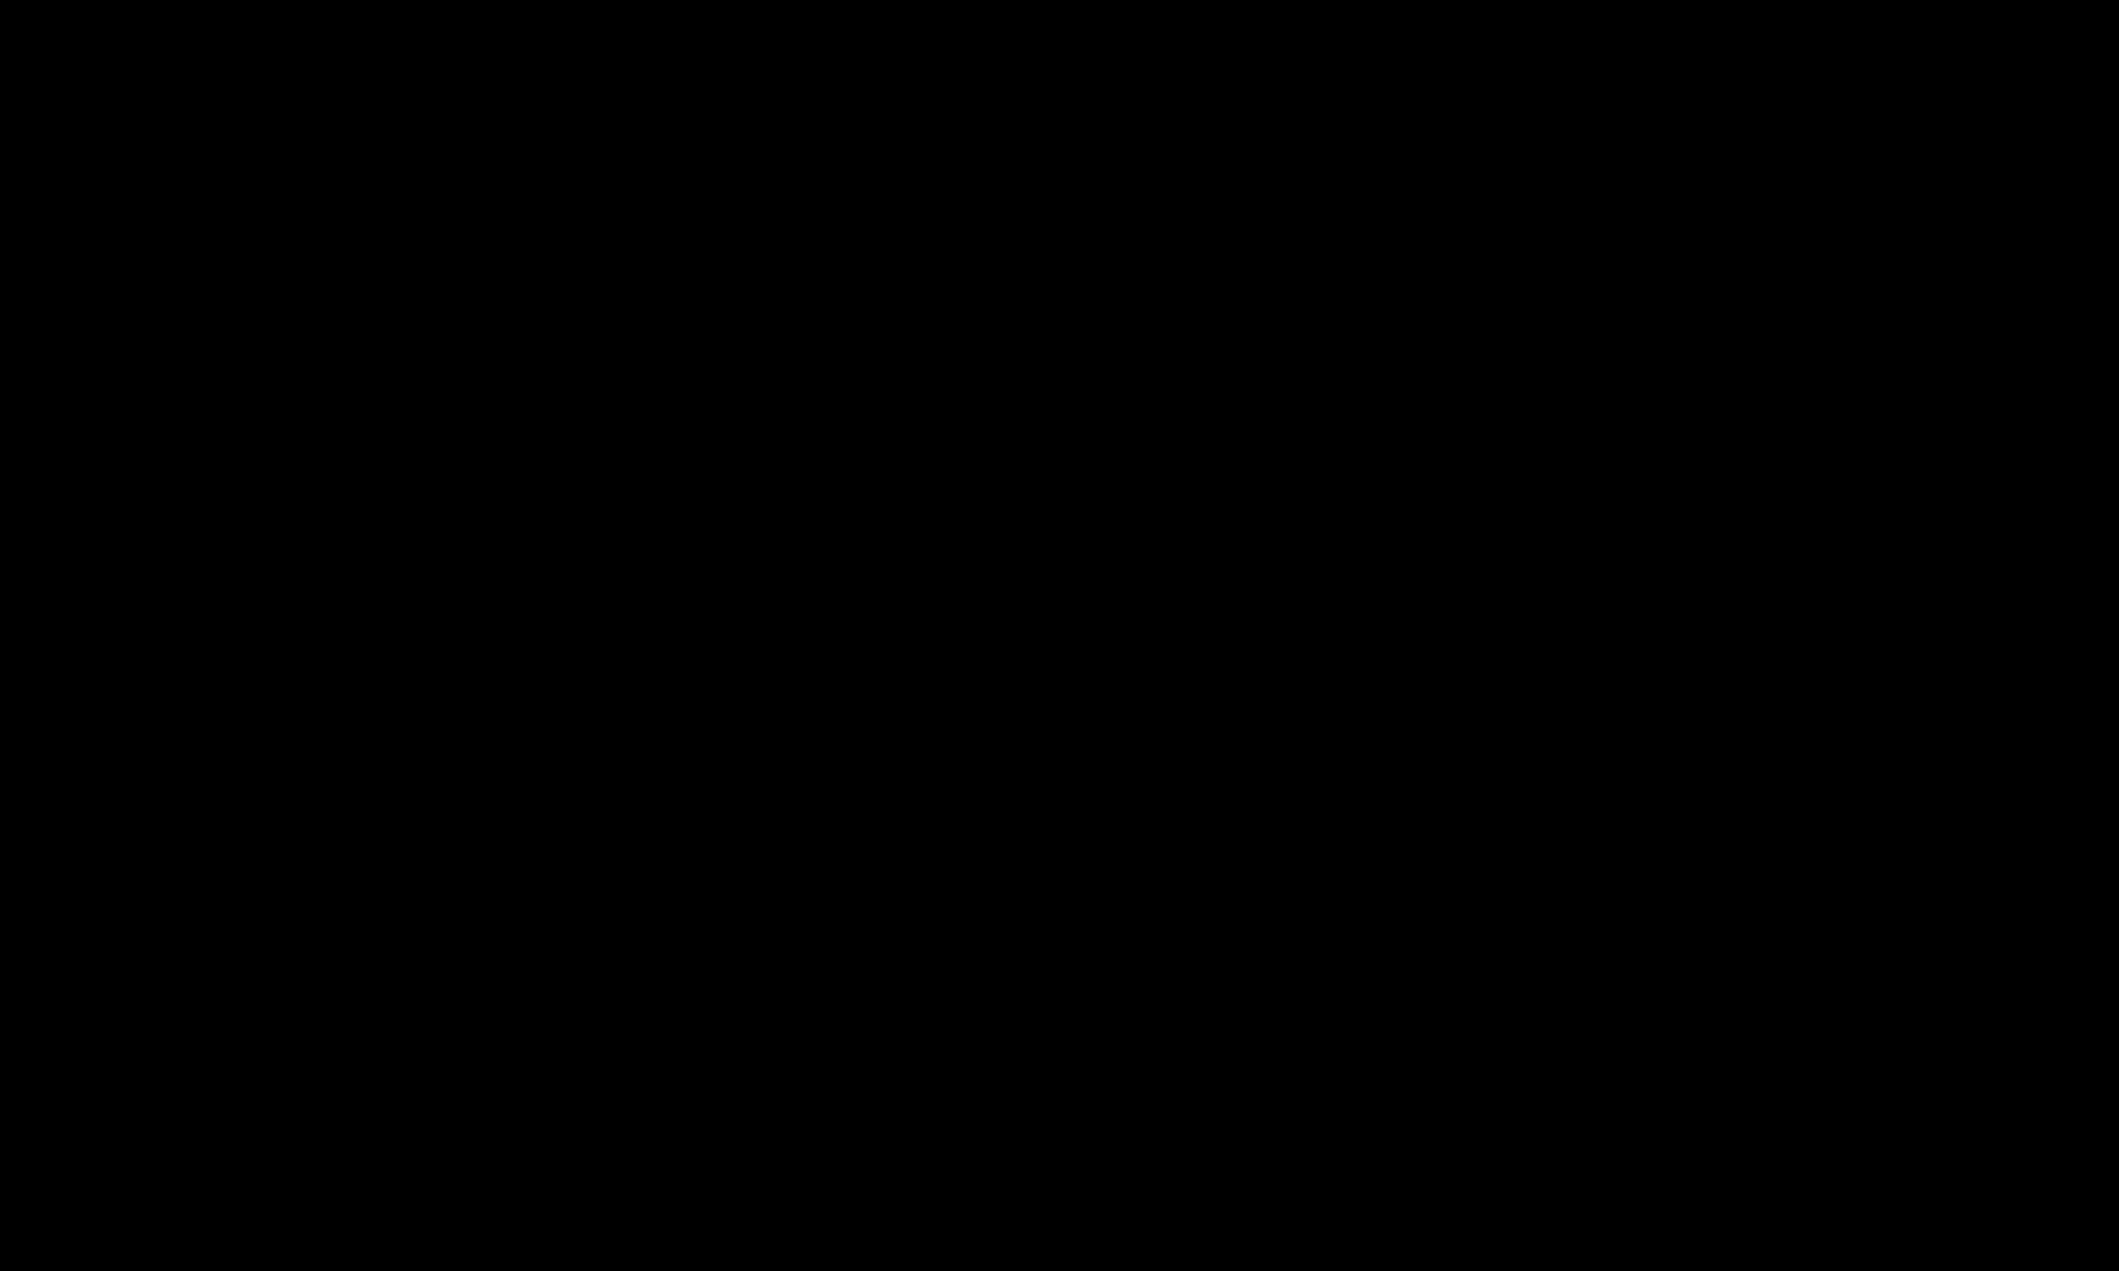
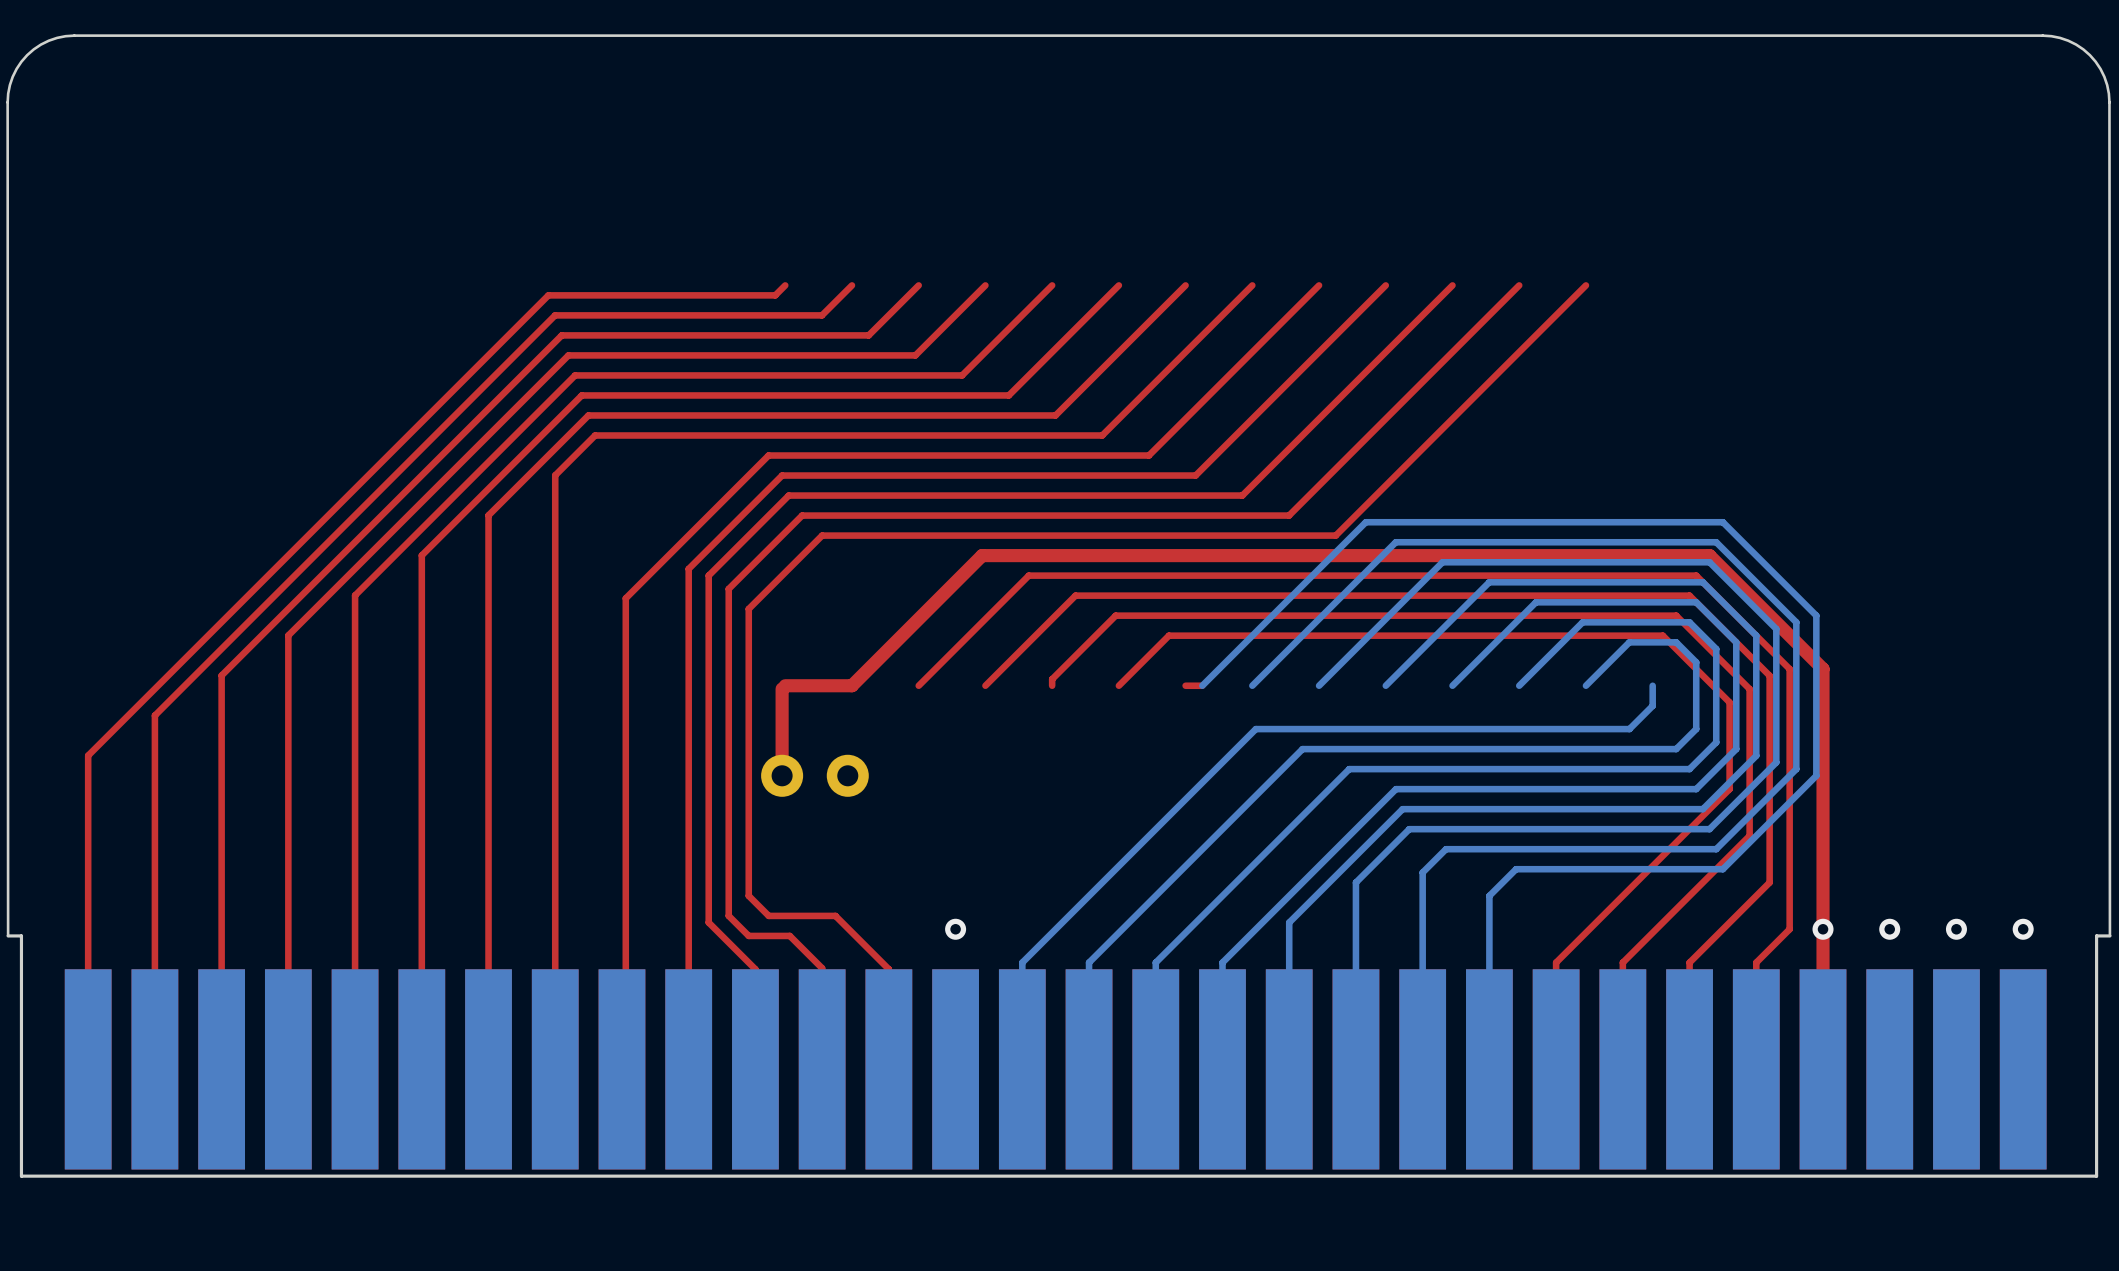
top track: none -> (785, 285) (775, 295) (548, 295) (88, 755) (88, 1069)
top track: none -> (851, 285) (821, 315) (555, 315) (154, 715) (154, 1069)
top track: none -> (918, 285) (868, 335) (561, 335) (221, 675) (221, 1069)
top track: none -> (985, 285) (915, 355) (568, 355) (288, 635) (288, 1069)
top track: none -> (1052, 285) (962, 375) (575, 375) (355, 595) (355, 1069)
top track: none -> (1118, 285) (1008, 395) (581, 395) (421, 555) (421, 1069)
top track: none -> (1185, 285) (1055, 415) (588, 415) (488, 515) (488, 1069)
top track: none -> (1252, 285) (1102, 435) (595, 435) (555, 475) (555, 1069)
top track: none -> (1319, 285) (1148, 455) (768, 455) (625, 598) (625, 1065) (621, 1069)
top track: none -> (1385, 285) (1195, 475) (782, 475) (688, 568) (688, 1069)
top track: none -> (1452, 285) (1242, 495) (788, 495) (708, 575) (708, 922) (755, 969) (755, 1069)
top track: none -> (1519, 285) (1289, 515) (802, 515) (728, 588) (728, 915) (748, 935) (789, 935) (822, 968) (822, 1069)
top track: none -> (1585, 285) (1335, 535) (822, 535) (748, 608) (748, 895) (768, 915) (835, 915) (888, 969) (888, 1069)
top track: none -> (918, 685) (1028, 575) (1696, 575) (1789, 669) (1789, 929) (1756, 962) (1756, 1069)
top track: none -> (985, 685) (1075, 595) (1689, 595) (1769, 675) (1769, 882) (1689, 962) (1689, 1069)
top track: none -> (1052, 685) (1052, 679) (1115, 615) (1676, 615) (1749, 689) (1749, 835) (1622, 962) (1622, 1069)
top track: none -> (1118, 685) (1168, 635) (1662, 635) (1729, 702) (1729, 789) (1556, 962) (1556, 1069)
top track: none -> (1202, 685) (1185, 685)
bottom track: none -> (1202, 685) (1365, 522) (1722, 522) (1816, 615) (1816, 775) (1722, 869) (1516, 869) (1489, 895) (1489, 1069)
bottom track: none -> (1252, 685) (1395, 542) (1716, 542) (1796, 622) (1796, 769) (1716, 849) (1446, 849) (1422, 872) (1422, 1069)
bottom track: none -> (1319, 685) (1442, 562) (1709, 562) (1776, 629) (1776, 762) (1709, 829) (1409, 829) (1355, 882) (1355, 1069)
bottom track: none -> (1385, 685) (1489, 582) (1702, 582) (1756, 635) (1756, 755) (1702, 809) (1402, 809) (1289, 922) (1289, 1069)
bottom track: none -> (1452, 685) (1535, 602) (1696, 602) (1736, 642) (1736, 749) (1696, 789) (1395, 789) (1222, 962) (1222, 1069)
bottom track: none -> (1519, 685) (1582, 622) (1689, 622) (1716, 649) (1716, 742) (1689, 769) (1349, 769) (1155, 962) (1155, 1069)
bottom track: none -> (1585, 685) (1629, 642) (1676, 642) (1696, 662) (1696, 729) (1676, 749) (1302, 749) (1089, 962) (1089, 1069)
bottom track: none -> (1652, 685) (1652, 705) (1629, 729) (1255, 729) (1022, 962) (1022, 1069)
top track: none -> (782, 775) (782, 688) (785, 685) (851, 685) (982, 555) (1709, 555) (1823, 669) (1823, 1069)
part: none -> (814, 775)
via: none -> (955, 929)
via: none -> (1823, 929)
via: none -> (1889, 929)
via: none -> (1956, 929)
via: none -> (2023, 929)
board edge: none -> (2109, 935) (2108, 93) (2100, 68) (2089, 55) (2068, 40) (2042, 35) (74, 35) (48, 40) (33, 49) (21, 61) (9, 85) (7, 102) (8, 935)
part: none -> (1059, 1056)

